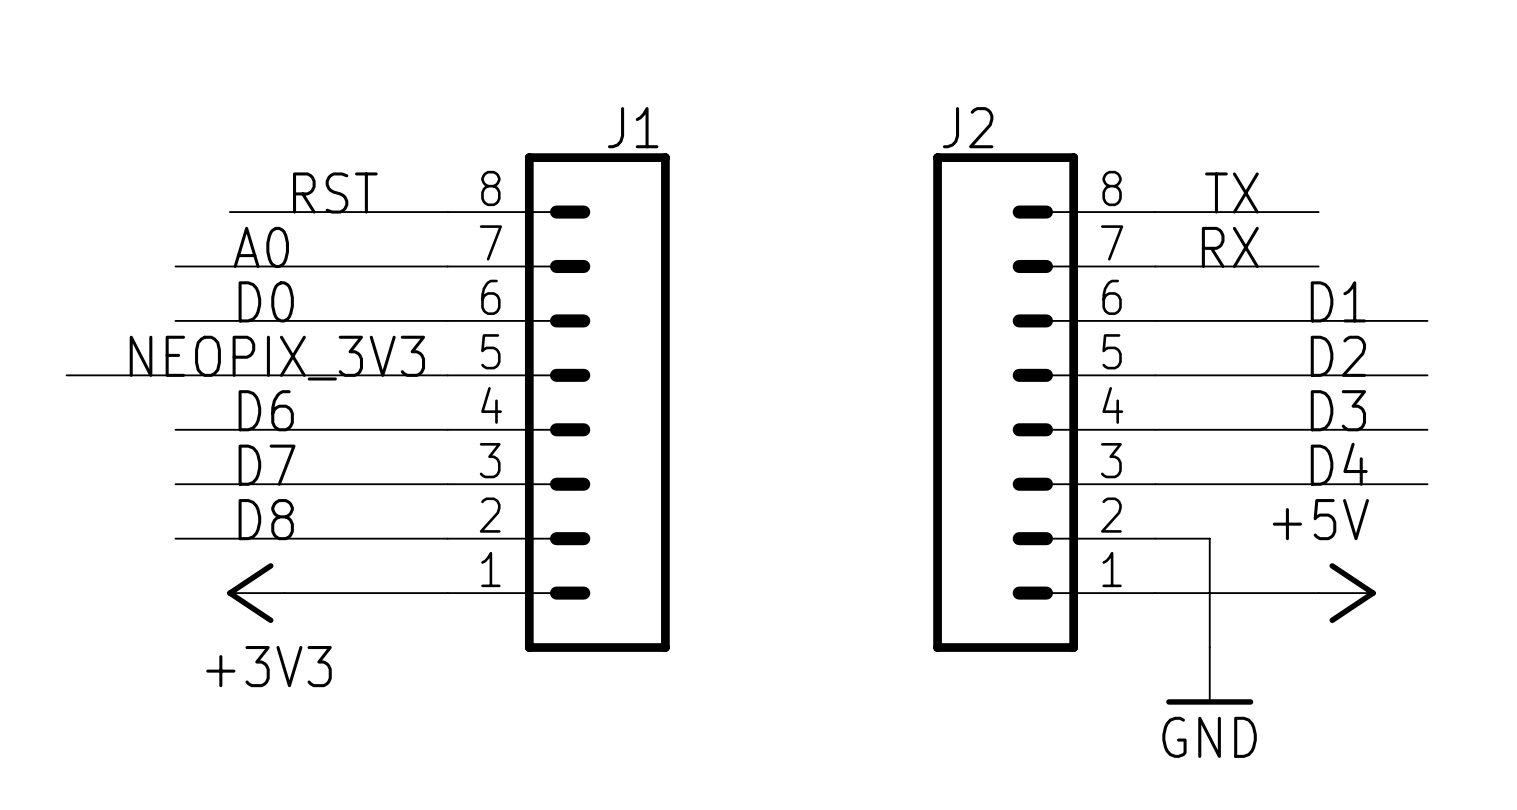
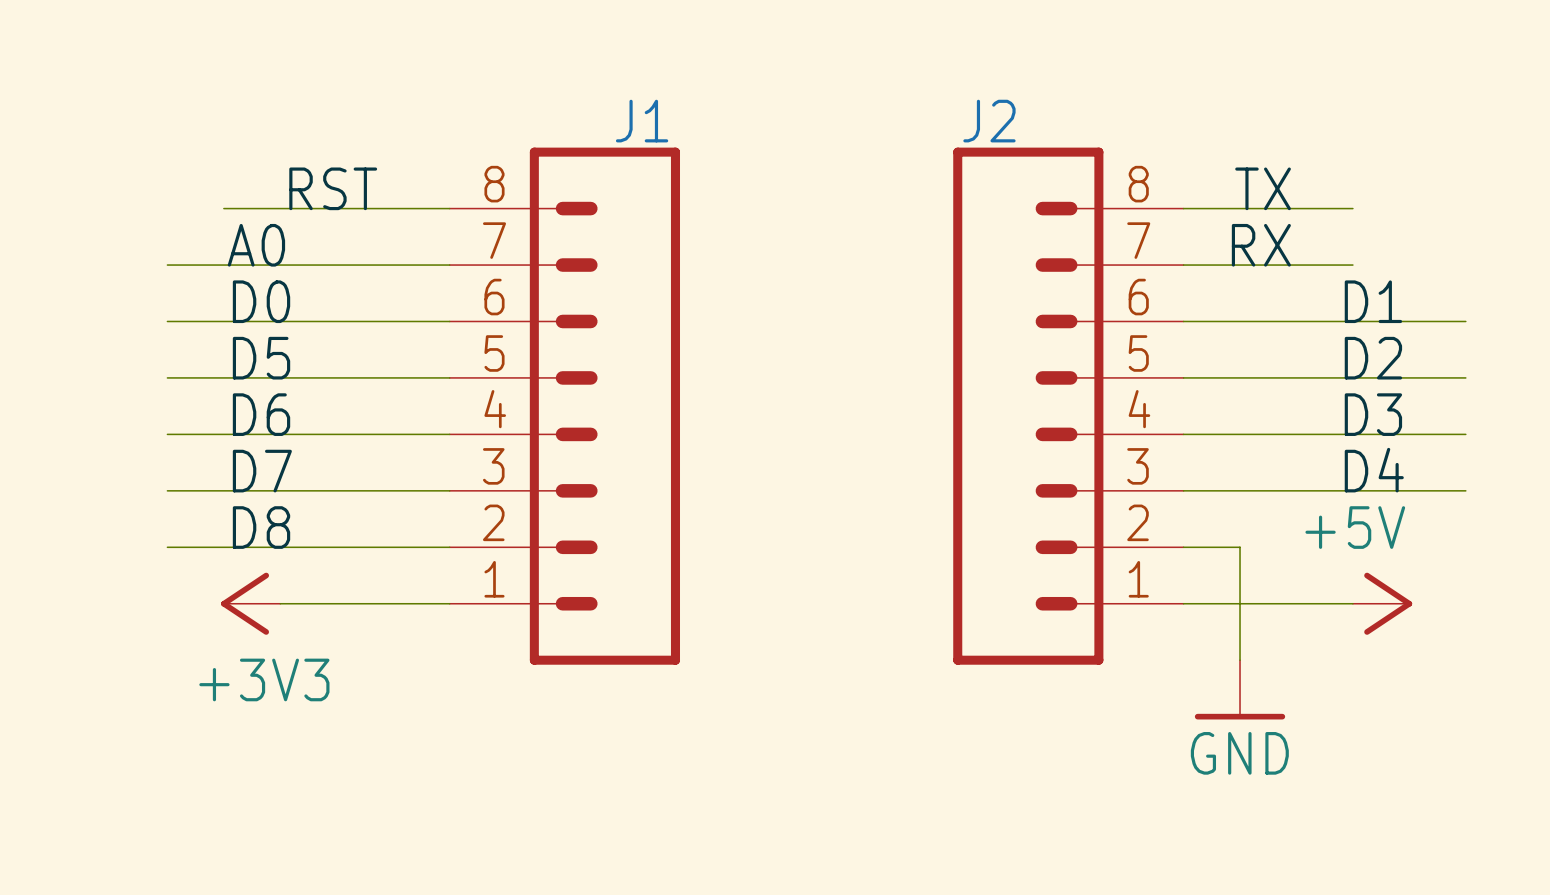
label: none -> D5 (261, 358)
label: NEOPIX_3V3 (277, 358) -> none
wire: (66, 375) (175, 375) -> none

